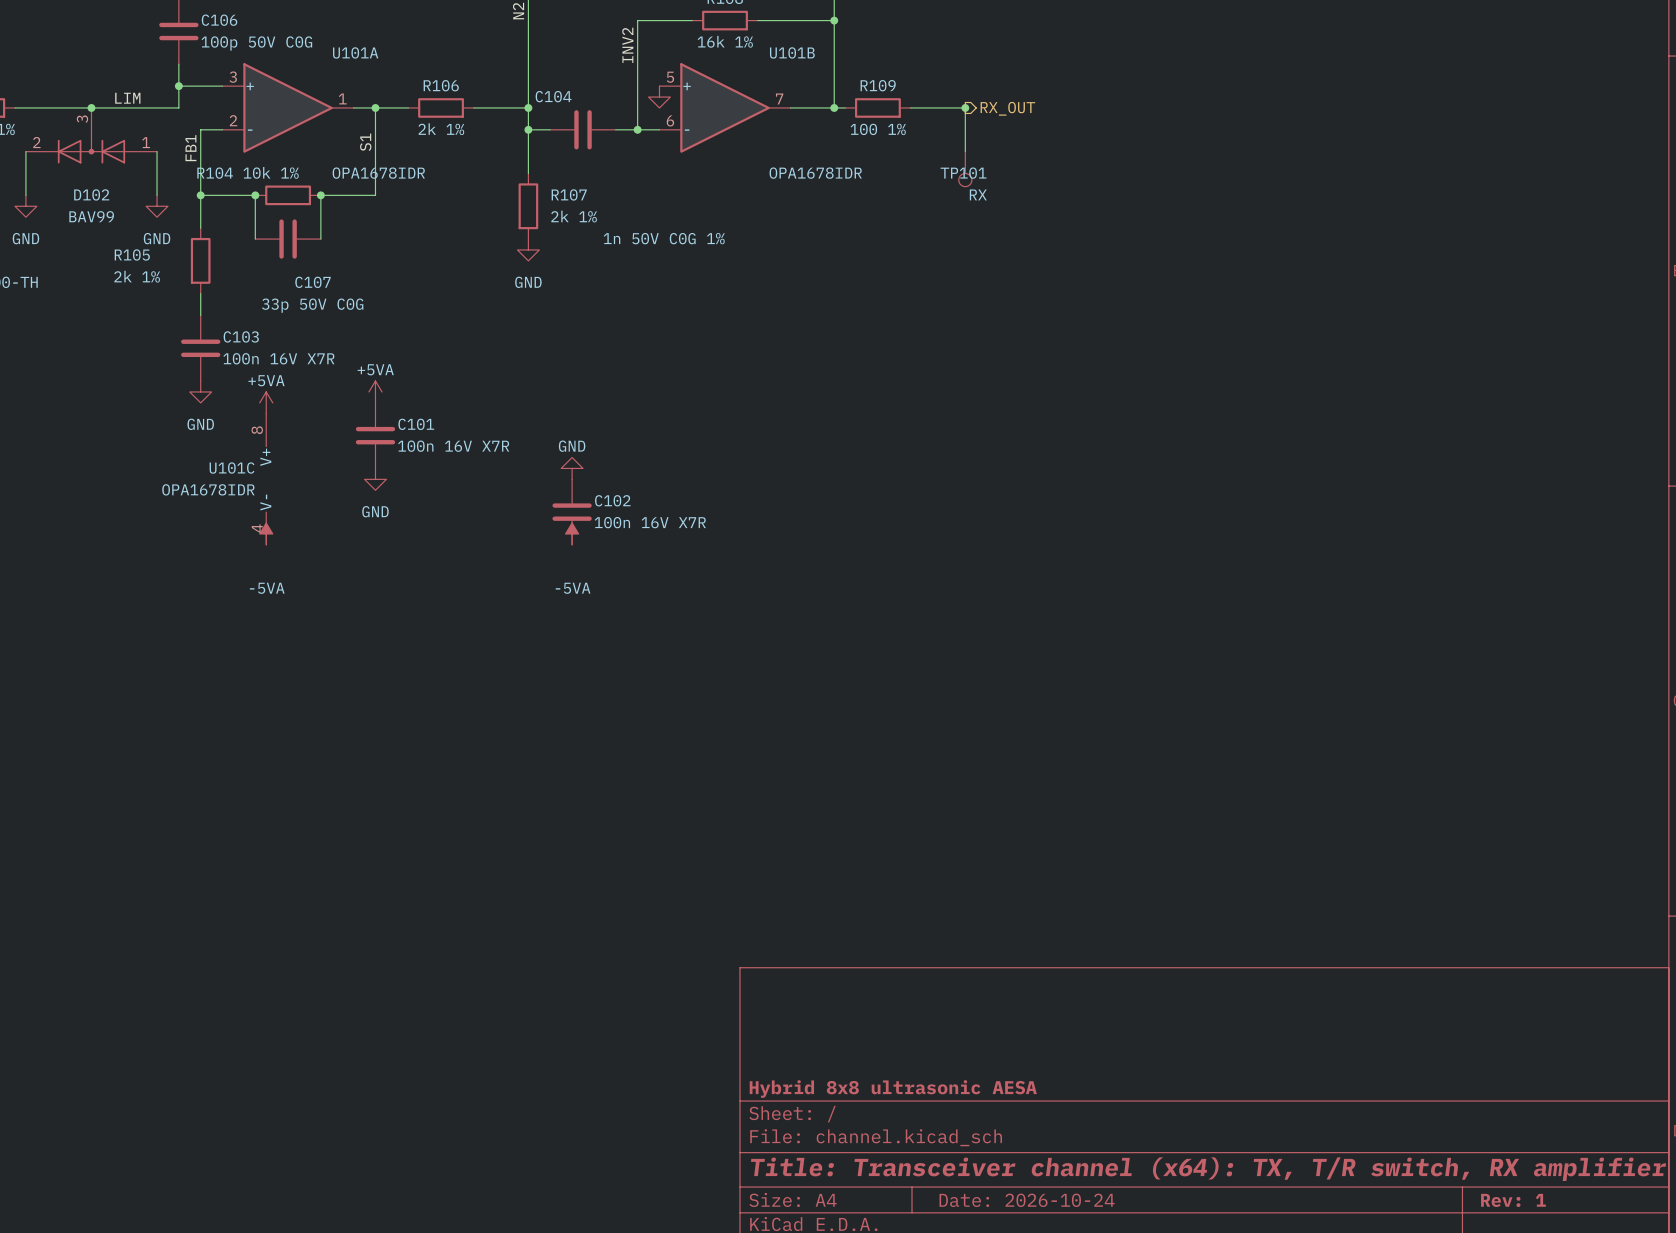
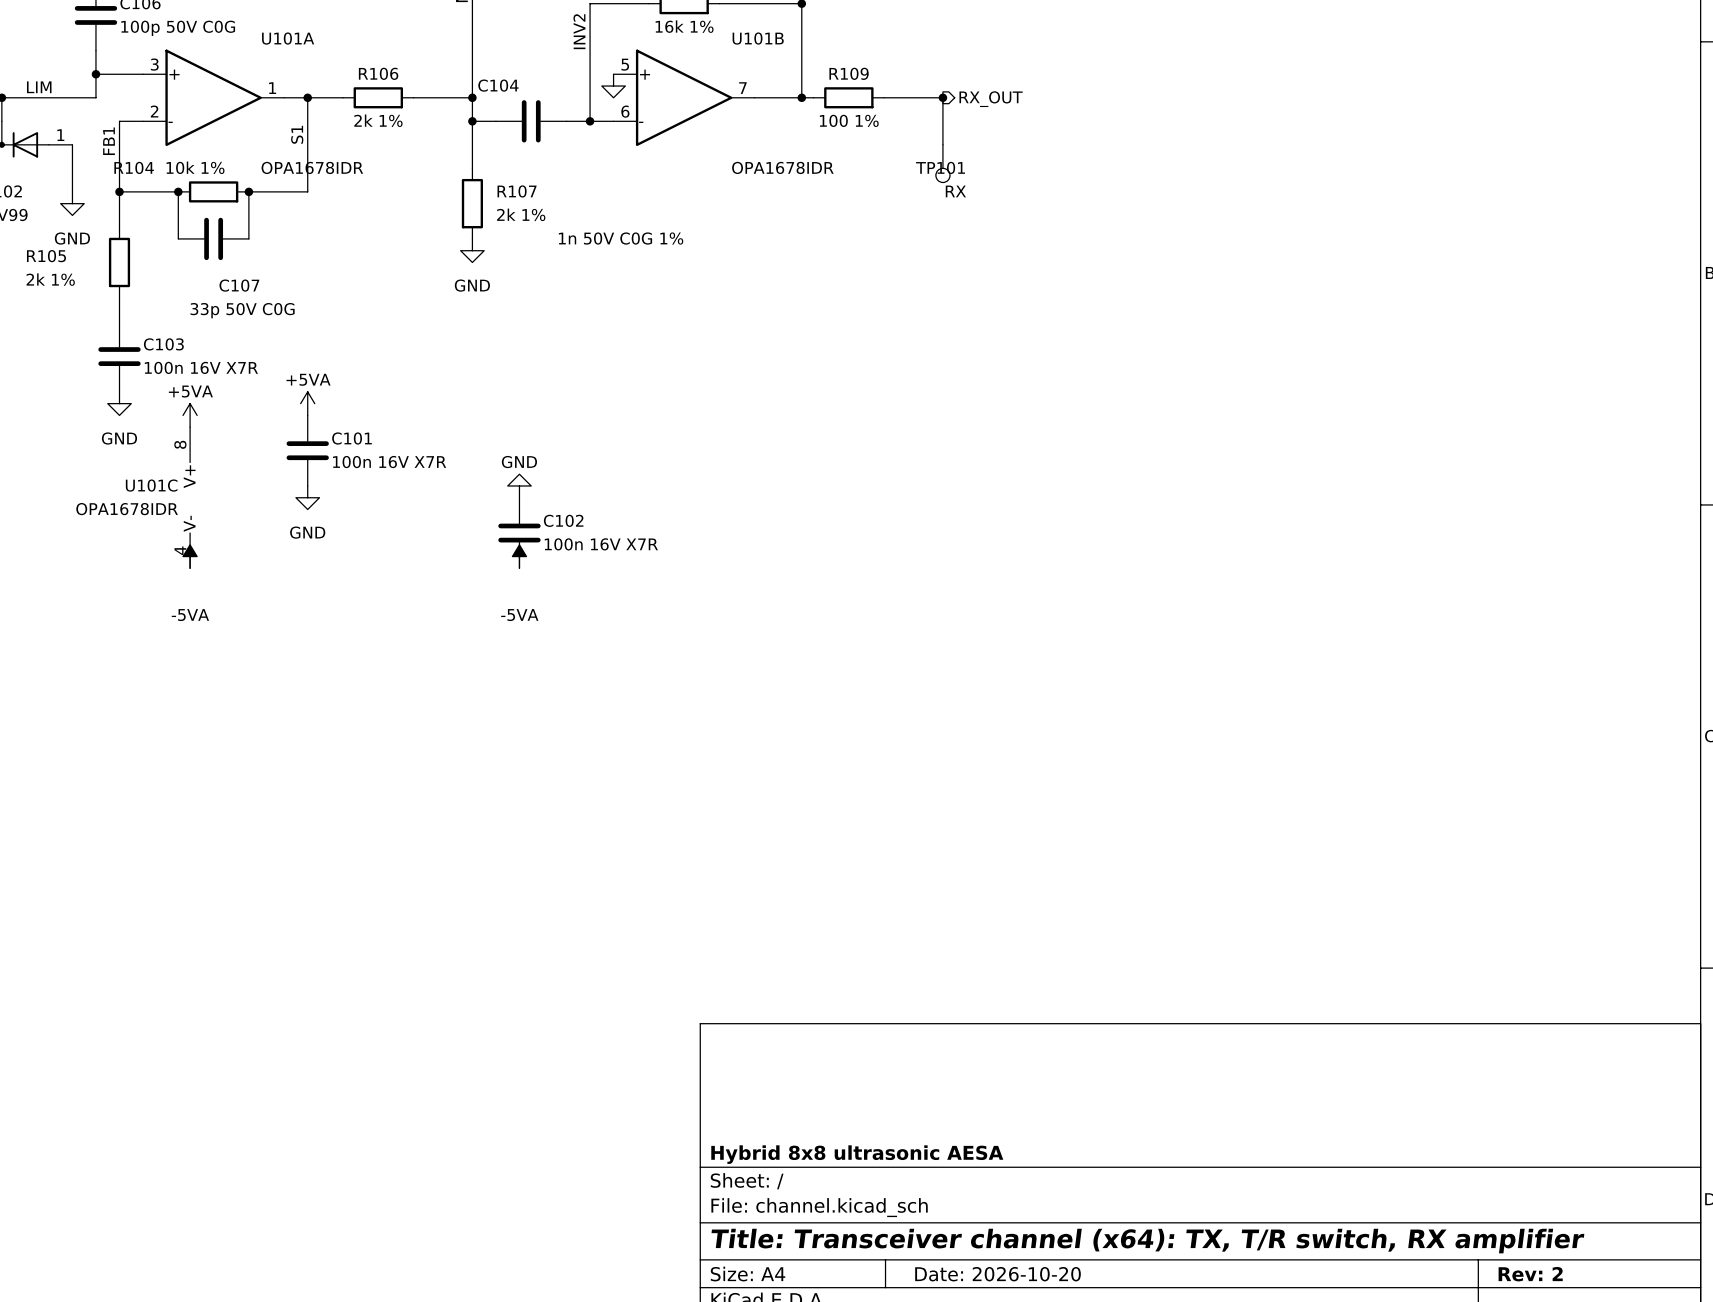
title block: Date: 2026-10-24 (1027, 1200) -> Date: 2026-10-20 (998, 1274)
title block: Rev: 1 (1513, 1200) -> Rev: 2 (1530, 1274)

